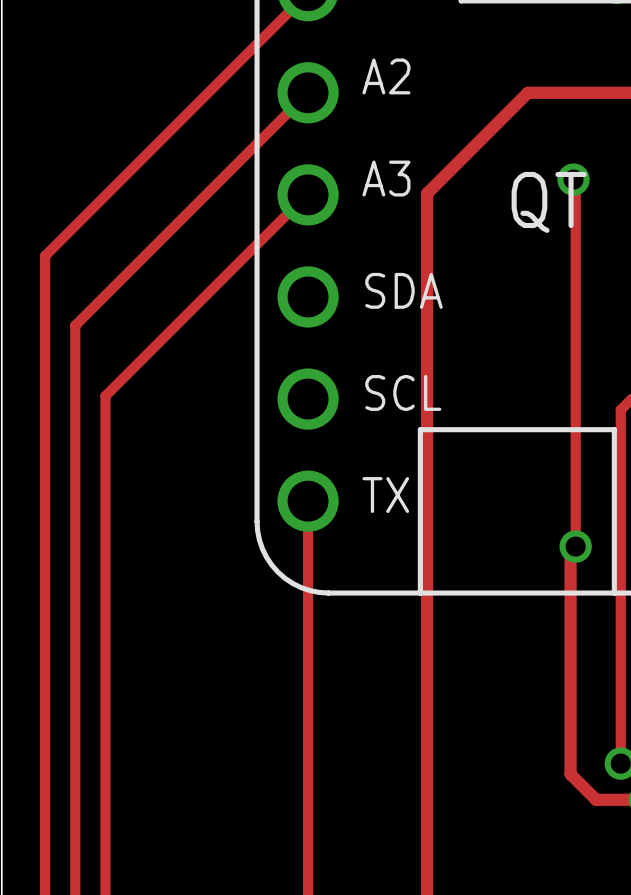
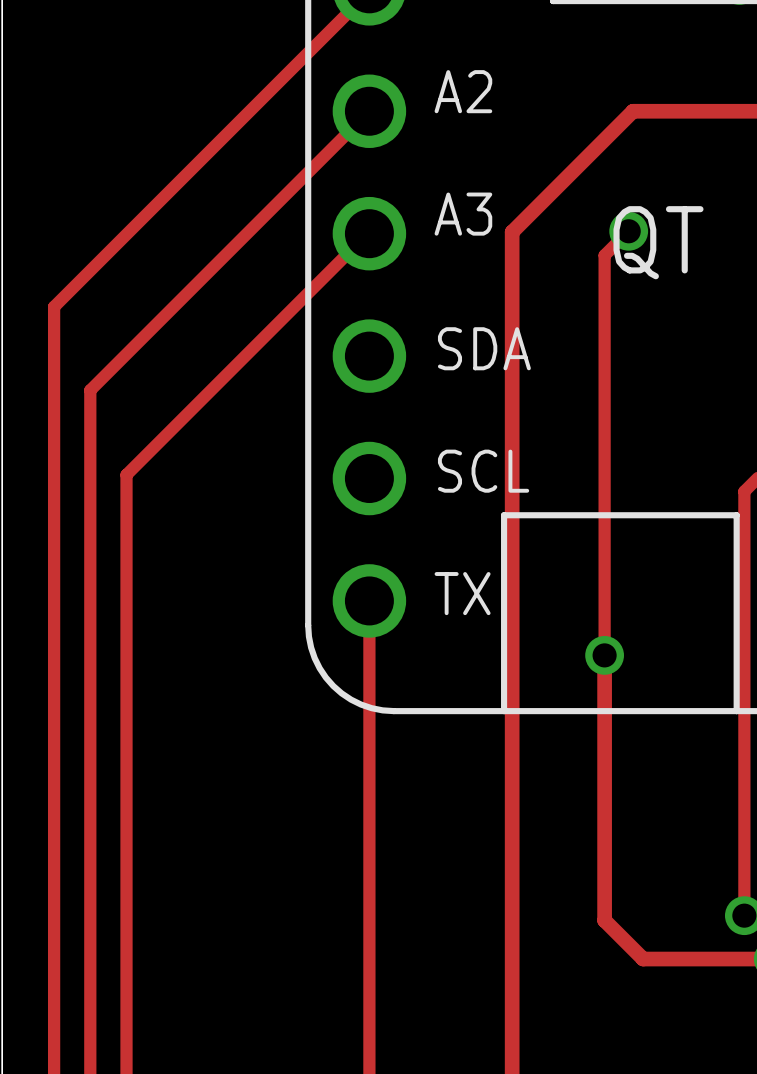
track: (573, 179) (575, 181) (575, 546) (570, 551) (570, 774) (596, 799) -> (628, 231) (604, 255) (604, 920) (643, 959) (714, 959)
via position: (573, 179) -> (628, 231)
via: none -> (604, 655)
via: (575, 546) -> none

